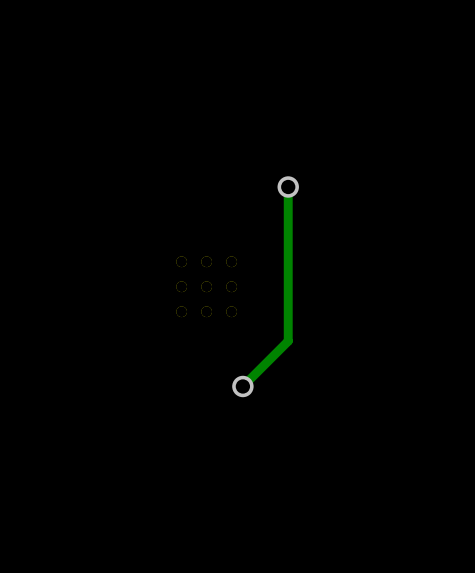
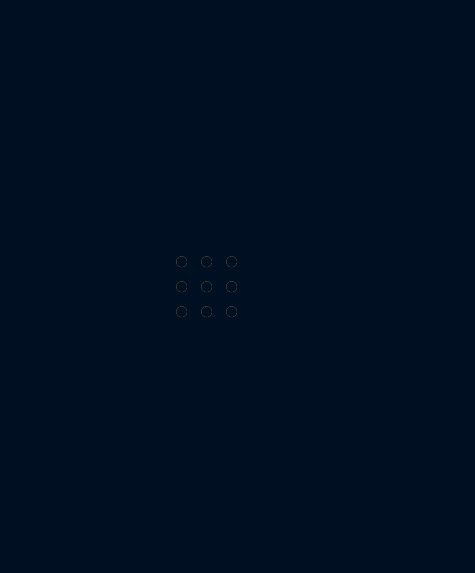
track: (288, 186) (288, 341) (242, 386) -> none
via: (288, 186) -> none
via: (242, 386) -> none

